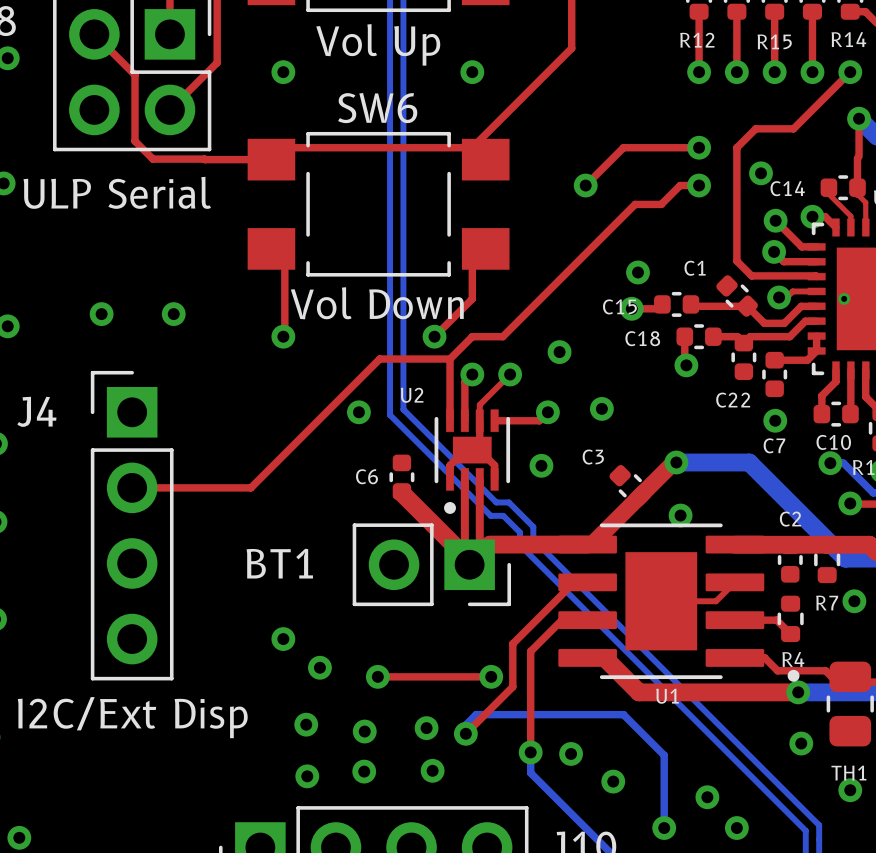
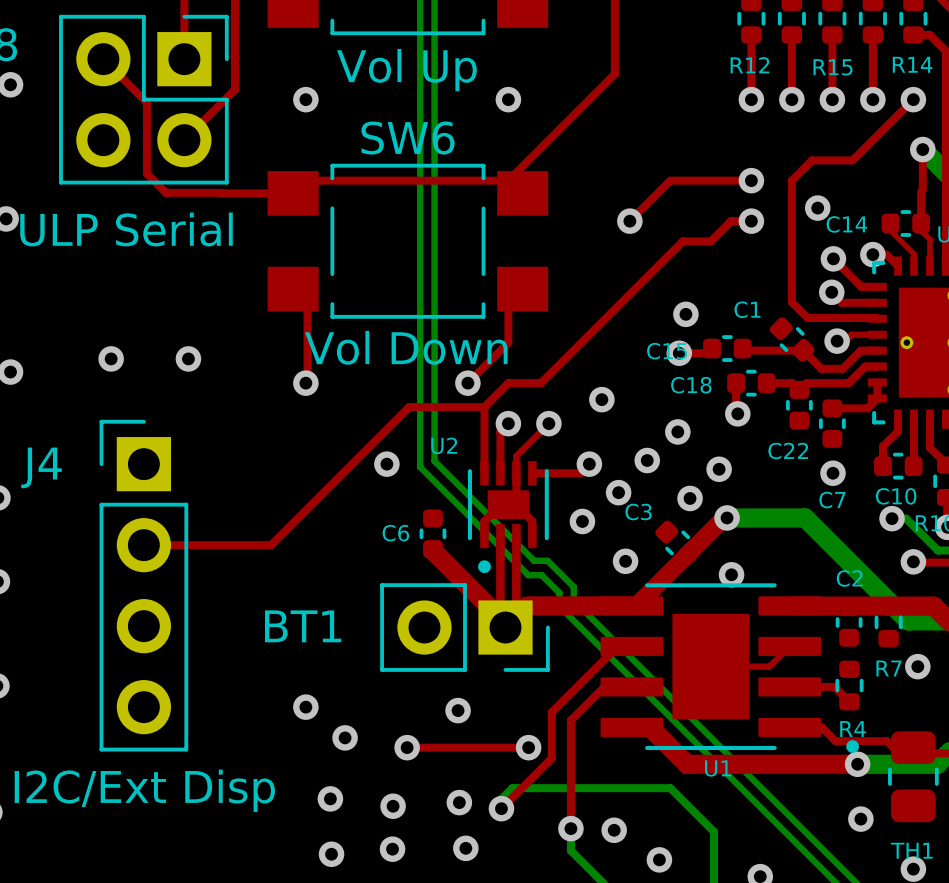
via: none -> (677, 431)
via: none -> (719, 469)
via: none -> (618, 492)
via: none -> (690, 498)
via: none -> (625, 561)
via: none -> (458, 710)

